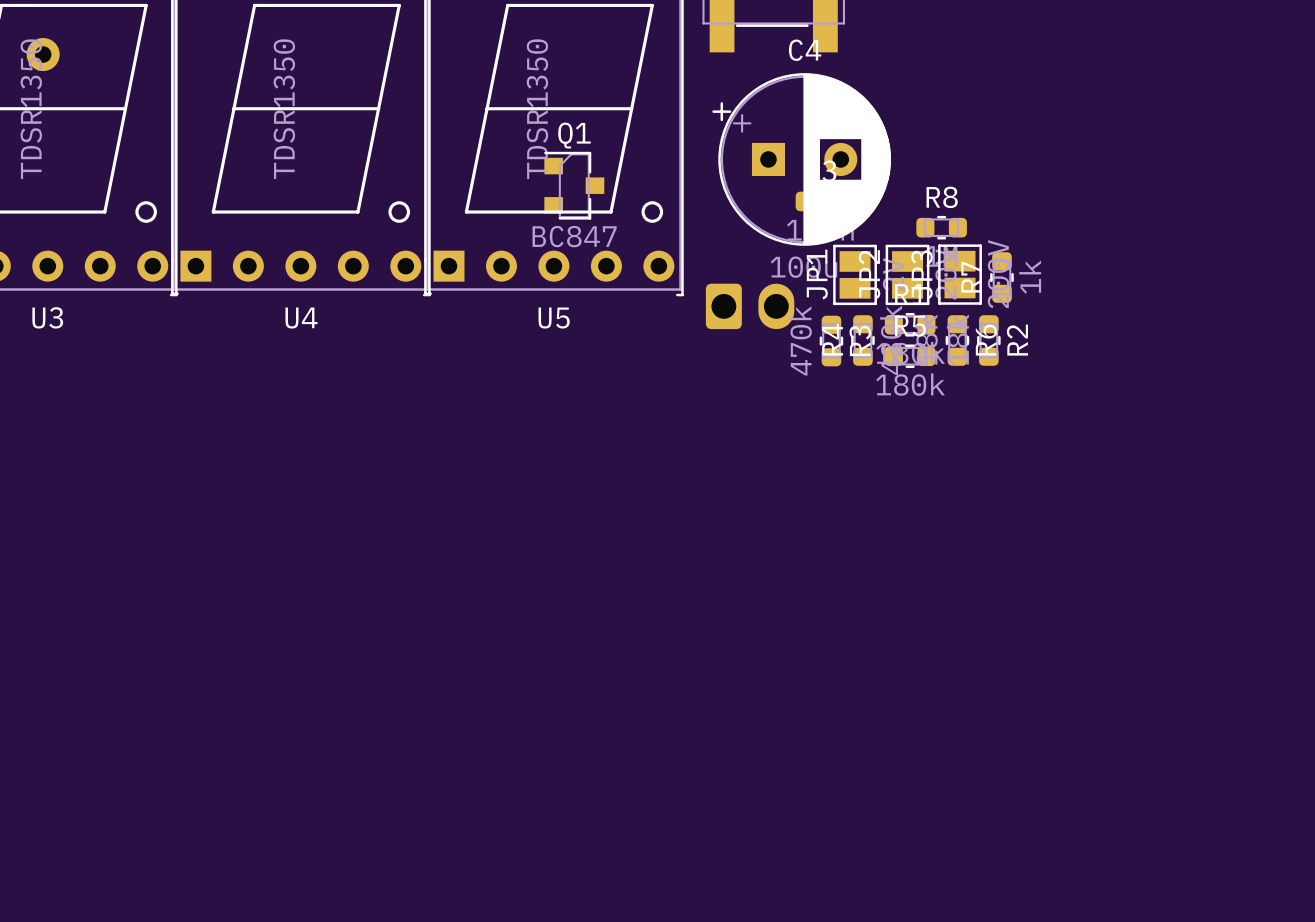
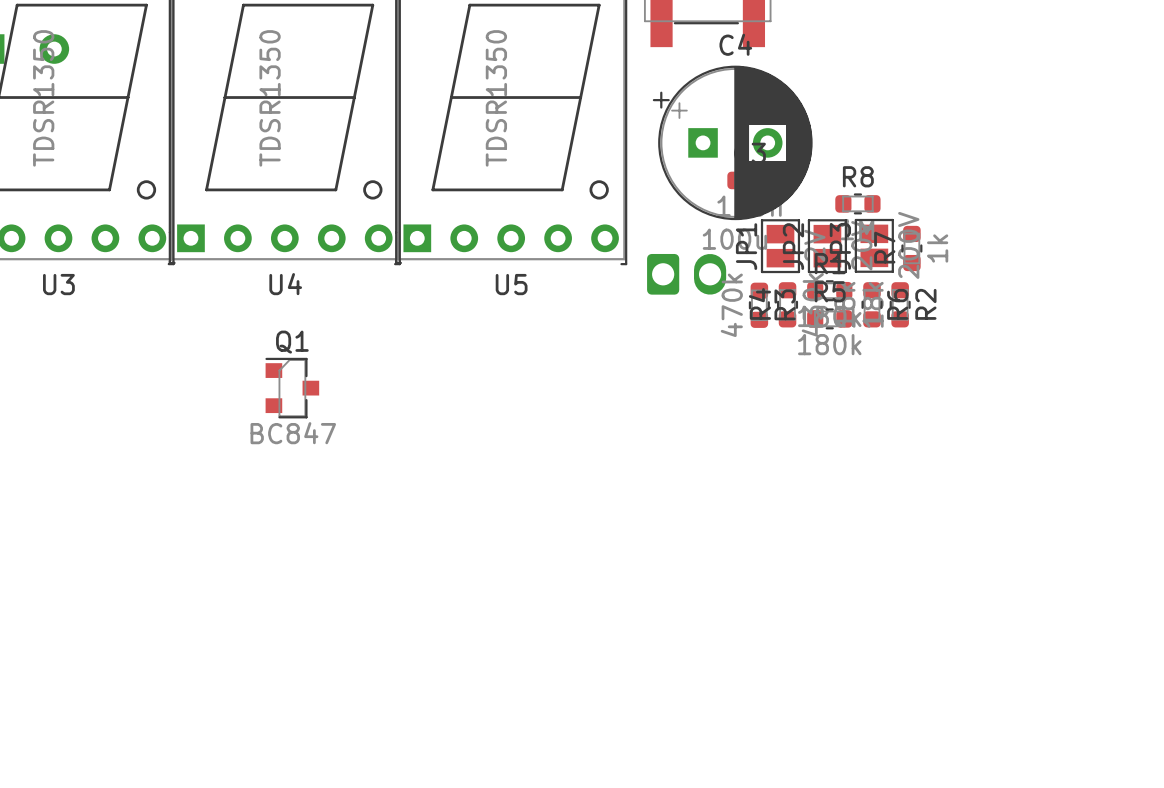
Q1 position: (574, 185) -> (292, 388)

